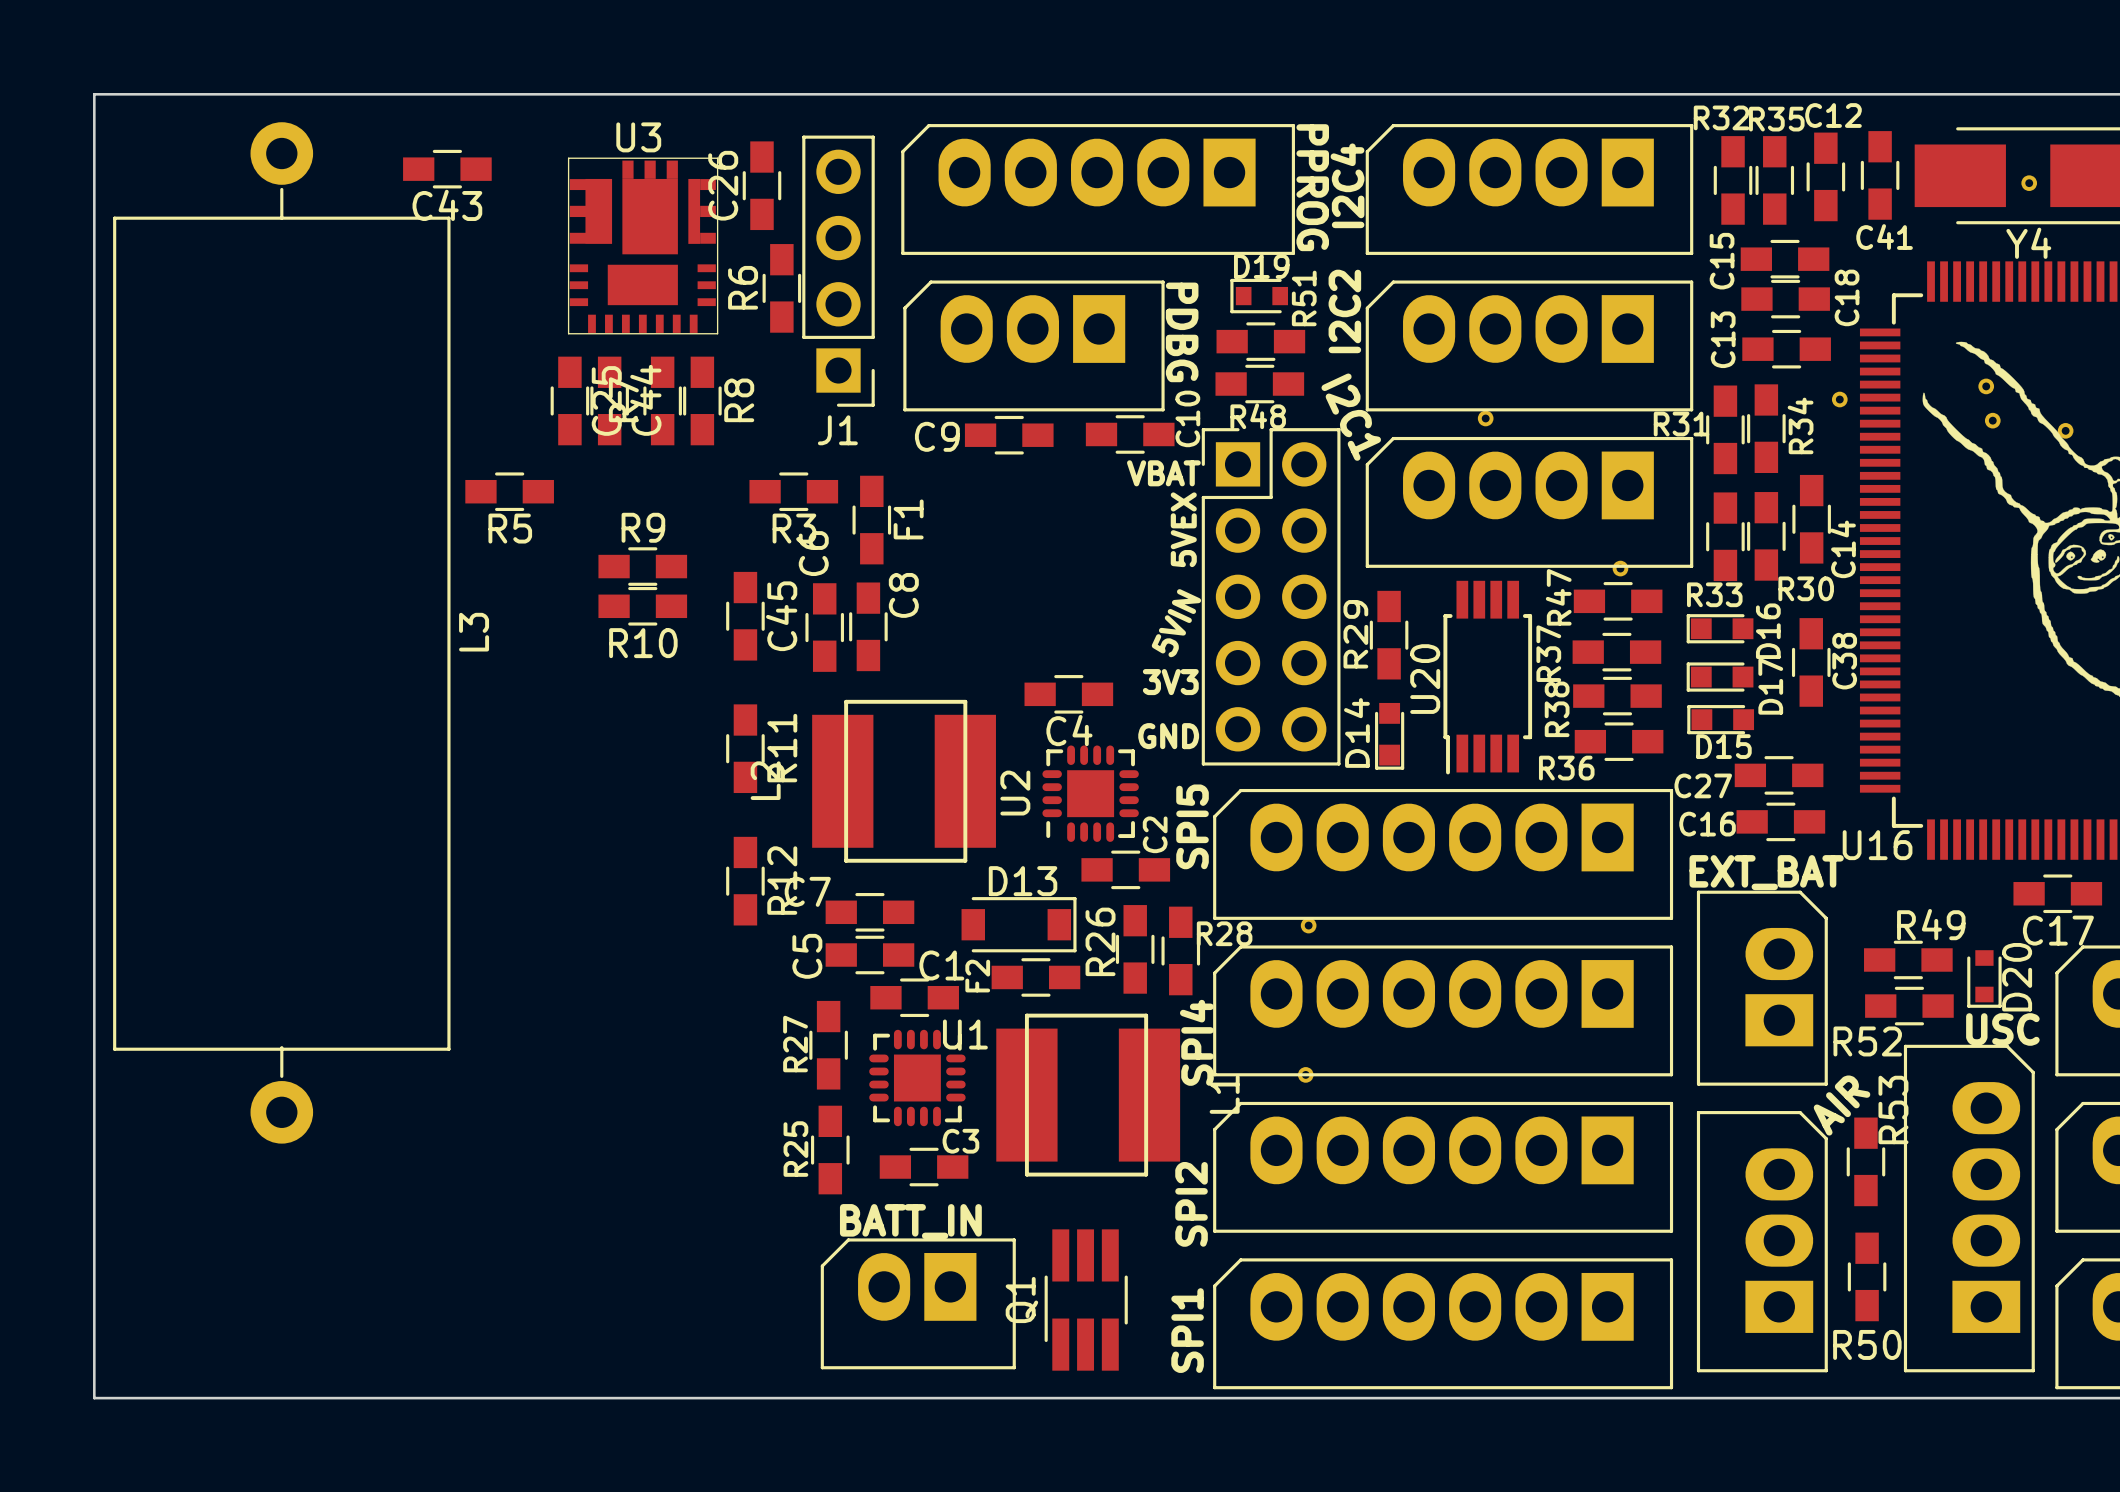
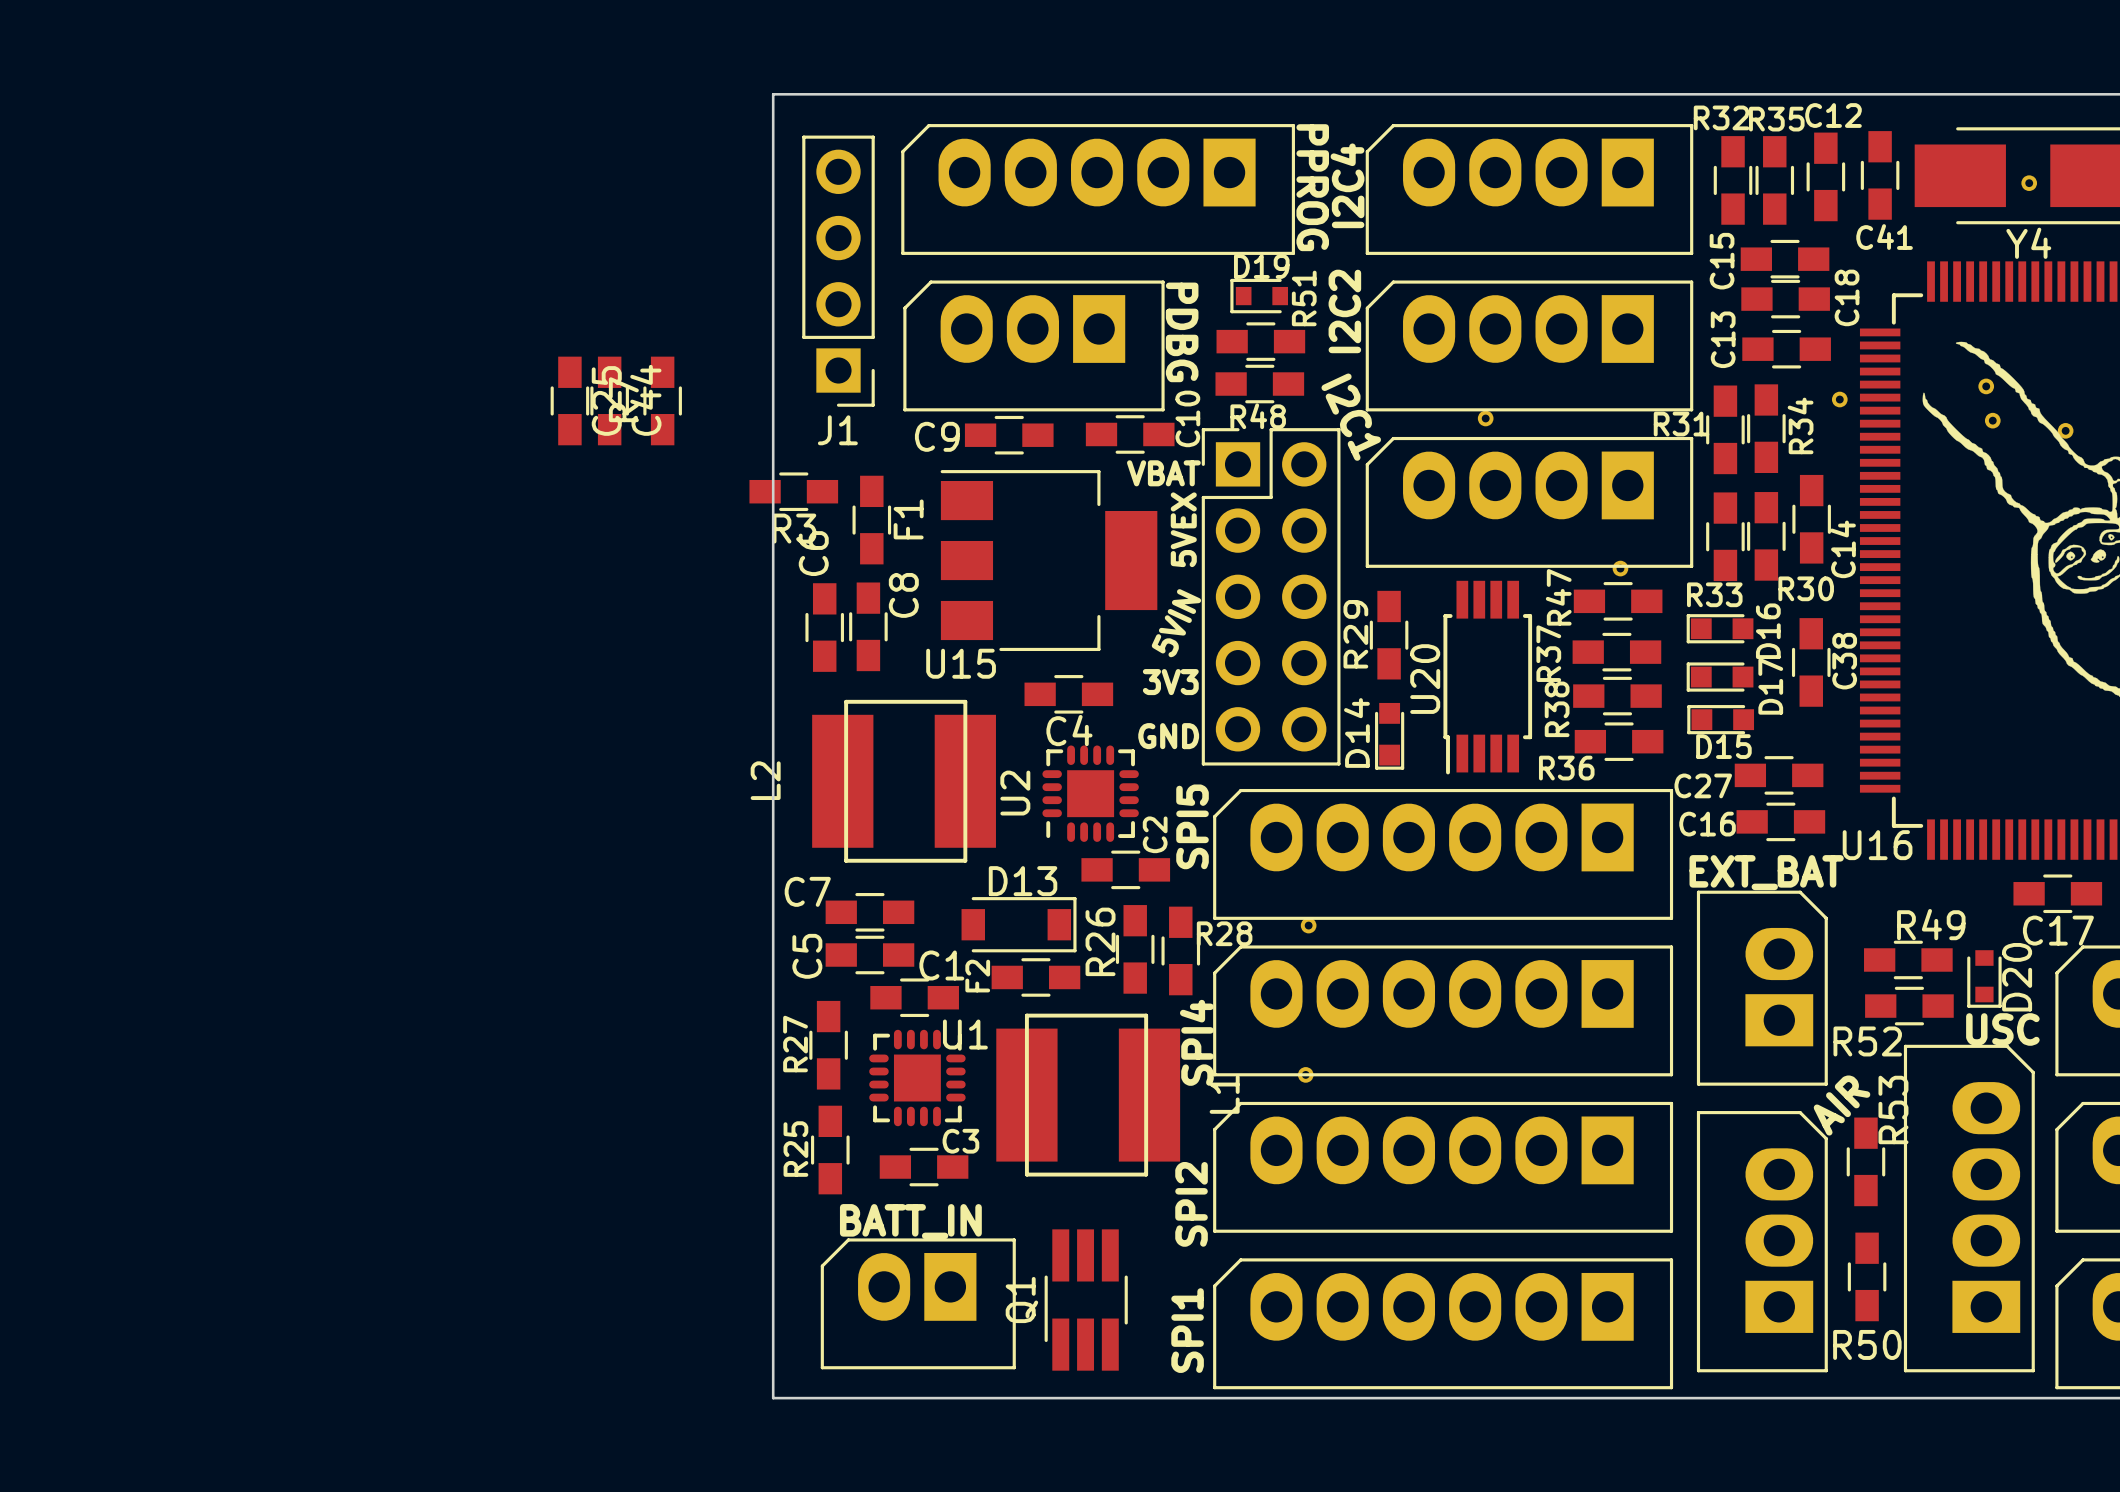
board edge: (773, 94) (94, 94) (94, 1398) (773, 1398) -> (773, 94) (773, 1398)
C43: (447, 169) -> none
C26: (761, 185) -> none
U3: (643, 245) -> none
R6: (781, 288) -> none
R8: (702, 400) -> none
R5: (509, 491) -> none
U15: none -> (1048, 560)
R9: (642, 566) -> none
R10: (642, 606) -> none
C45: (745, 616) -> none
L3: (281, 632) -> none
R11: (745, 748) -> none
R12: (745, 881) -> none

